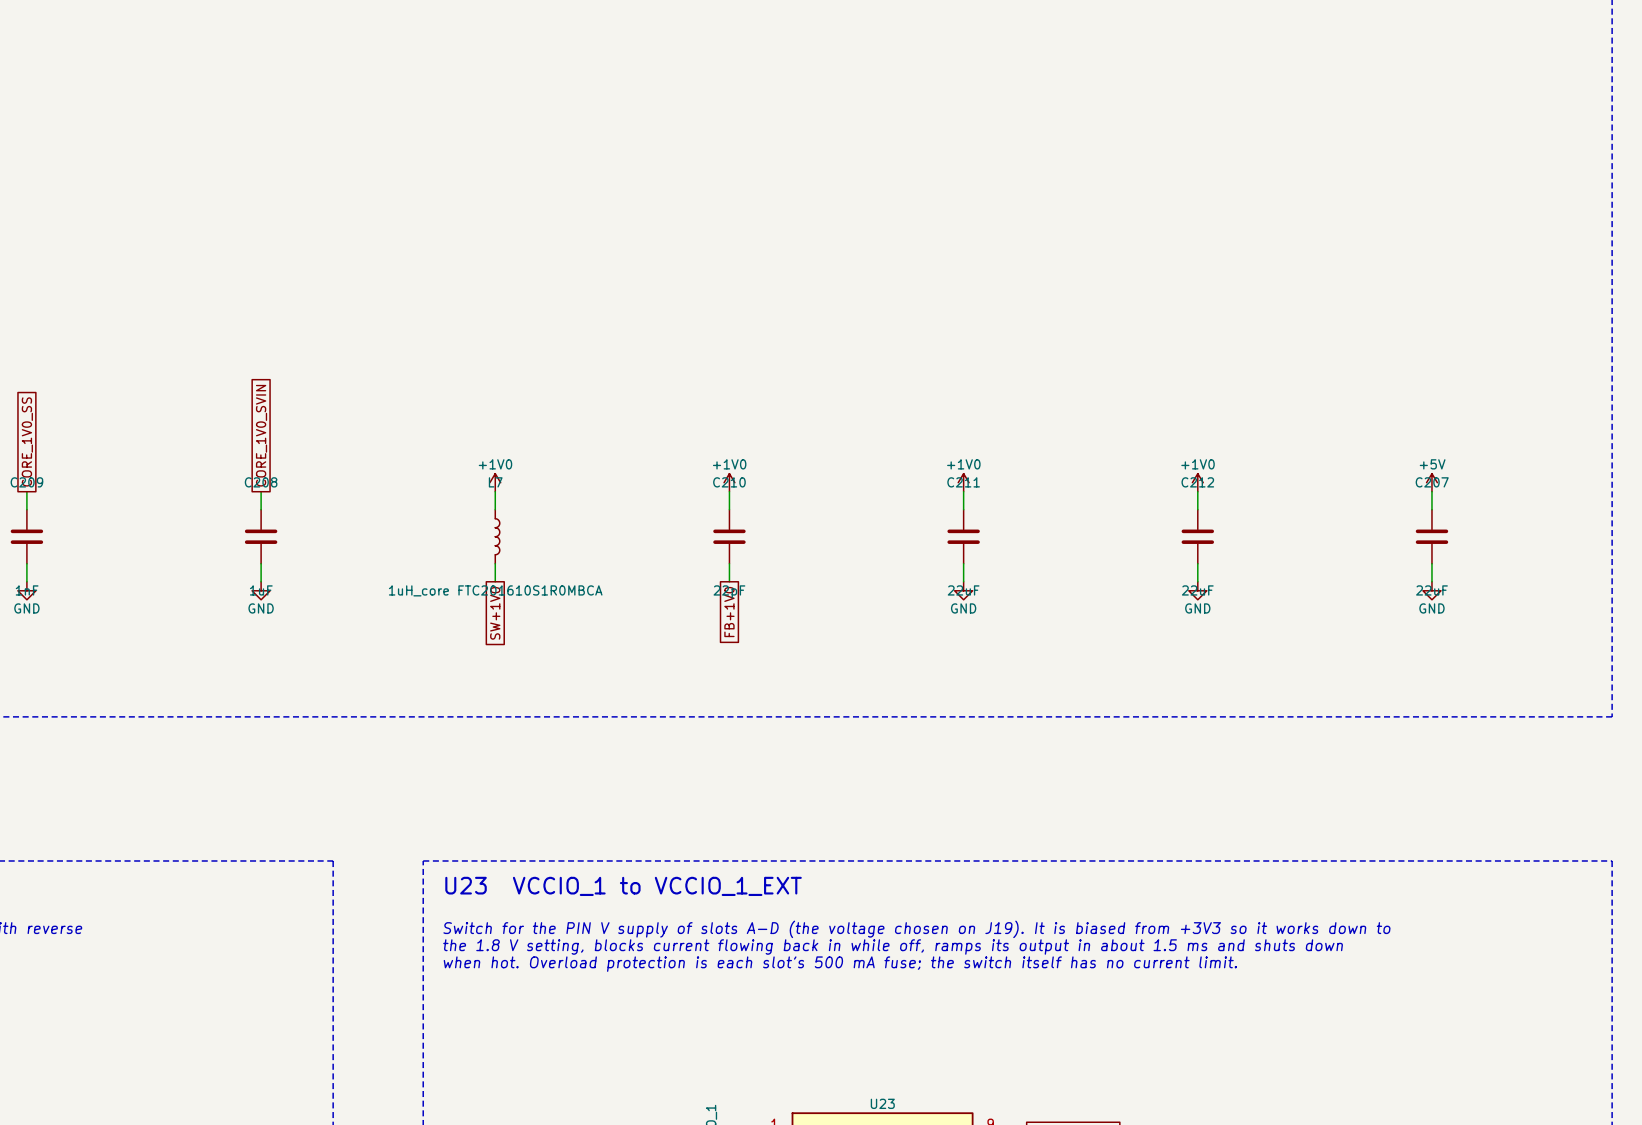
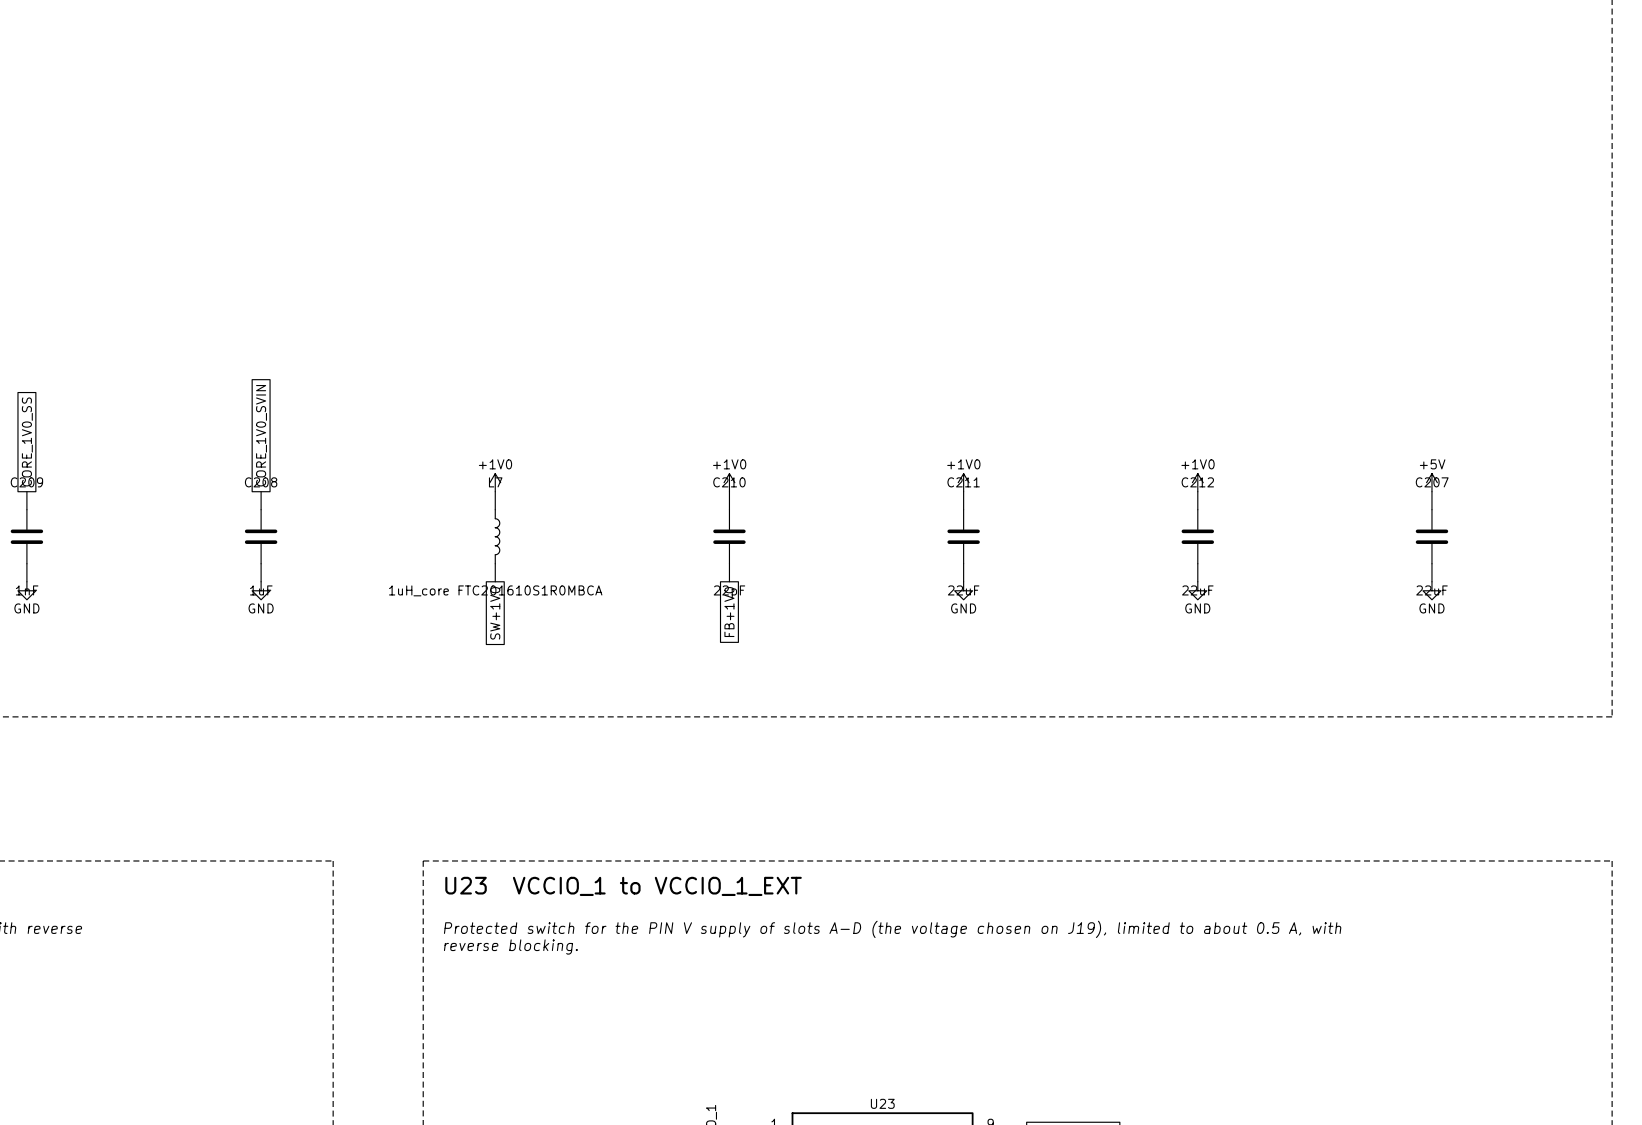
text: Switch for the PIN V supply of slots A-D (the voltage chosen on J19). It is biased from +3V3 so it works down to (916, 929) -> Protected switch for the PIN V supply of slots A-D (the voltage chosen on J19), limited to about 0.5 A, with (892, 929)
text: the 1.8 V setting, blocks current flowing back in while off, ramps its output in about 1.5 ms and shuts down (893, 946) -> reverse blocking. (510, 946)
text: when hot. Overload protection is each slot's 500 mA fuse; the switch itself has no current limit. (840, 964) -> none

